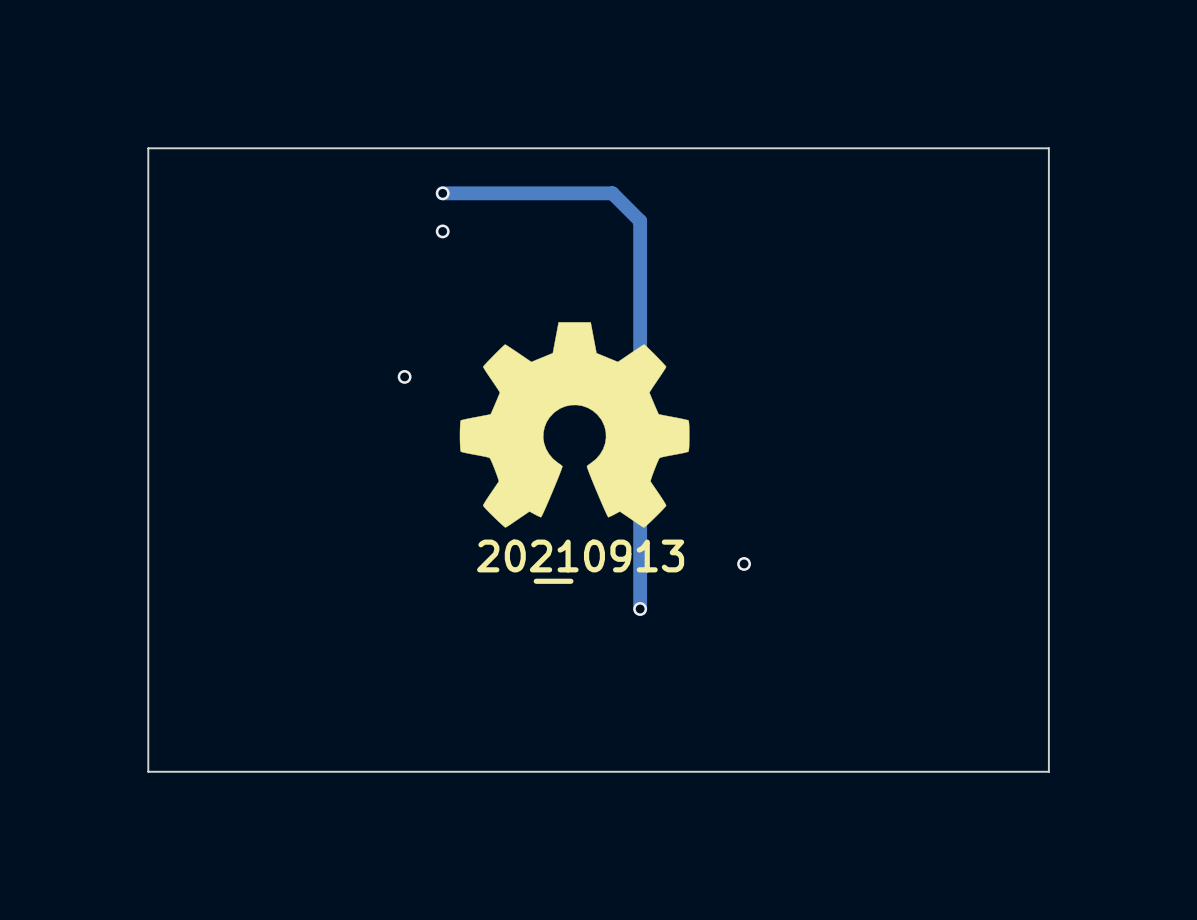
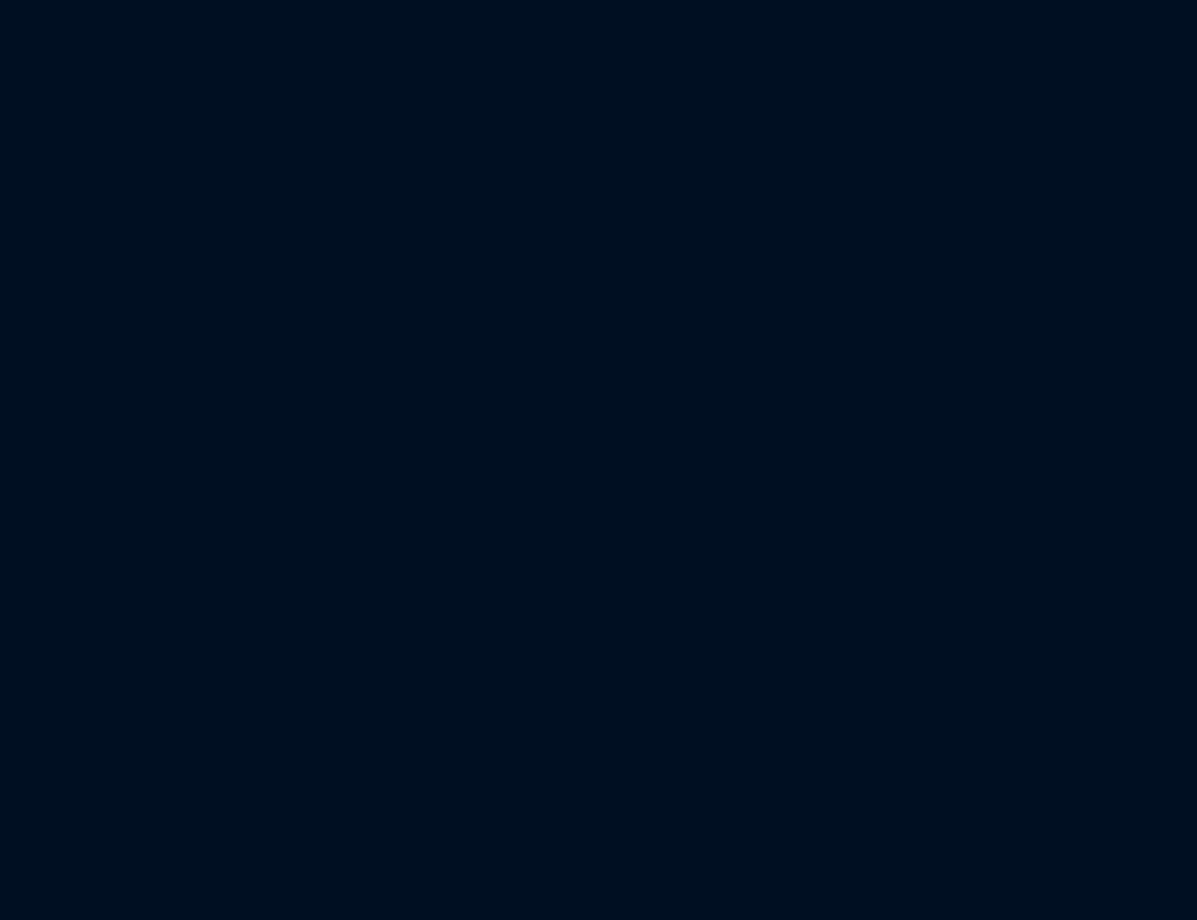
board edge: (1048, 148) (1048, 771) (148, 771) (148, 148) (1048, 148) -> none
track: (442, 193) (612, 193) (640, 221) (640, 608) -> none
via: (442, 193) -> none
via: (442, 231) -> none
drawing: [459, 322, 690, 584] -> none
via: (404, 376) -> none
via: (744, 563) -> none
via: (640, 608) -> none

